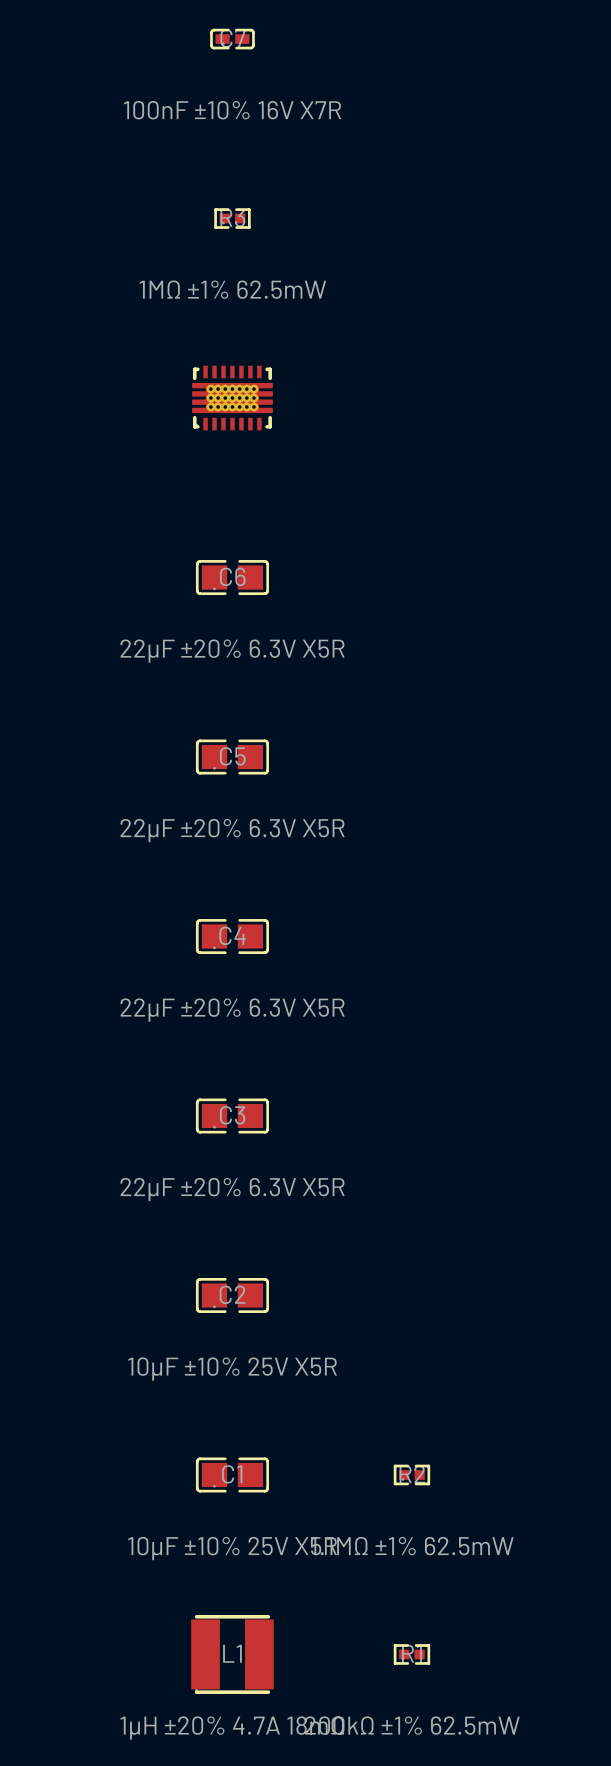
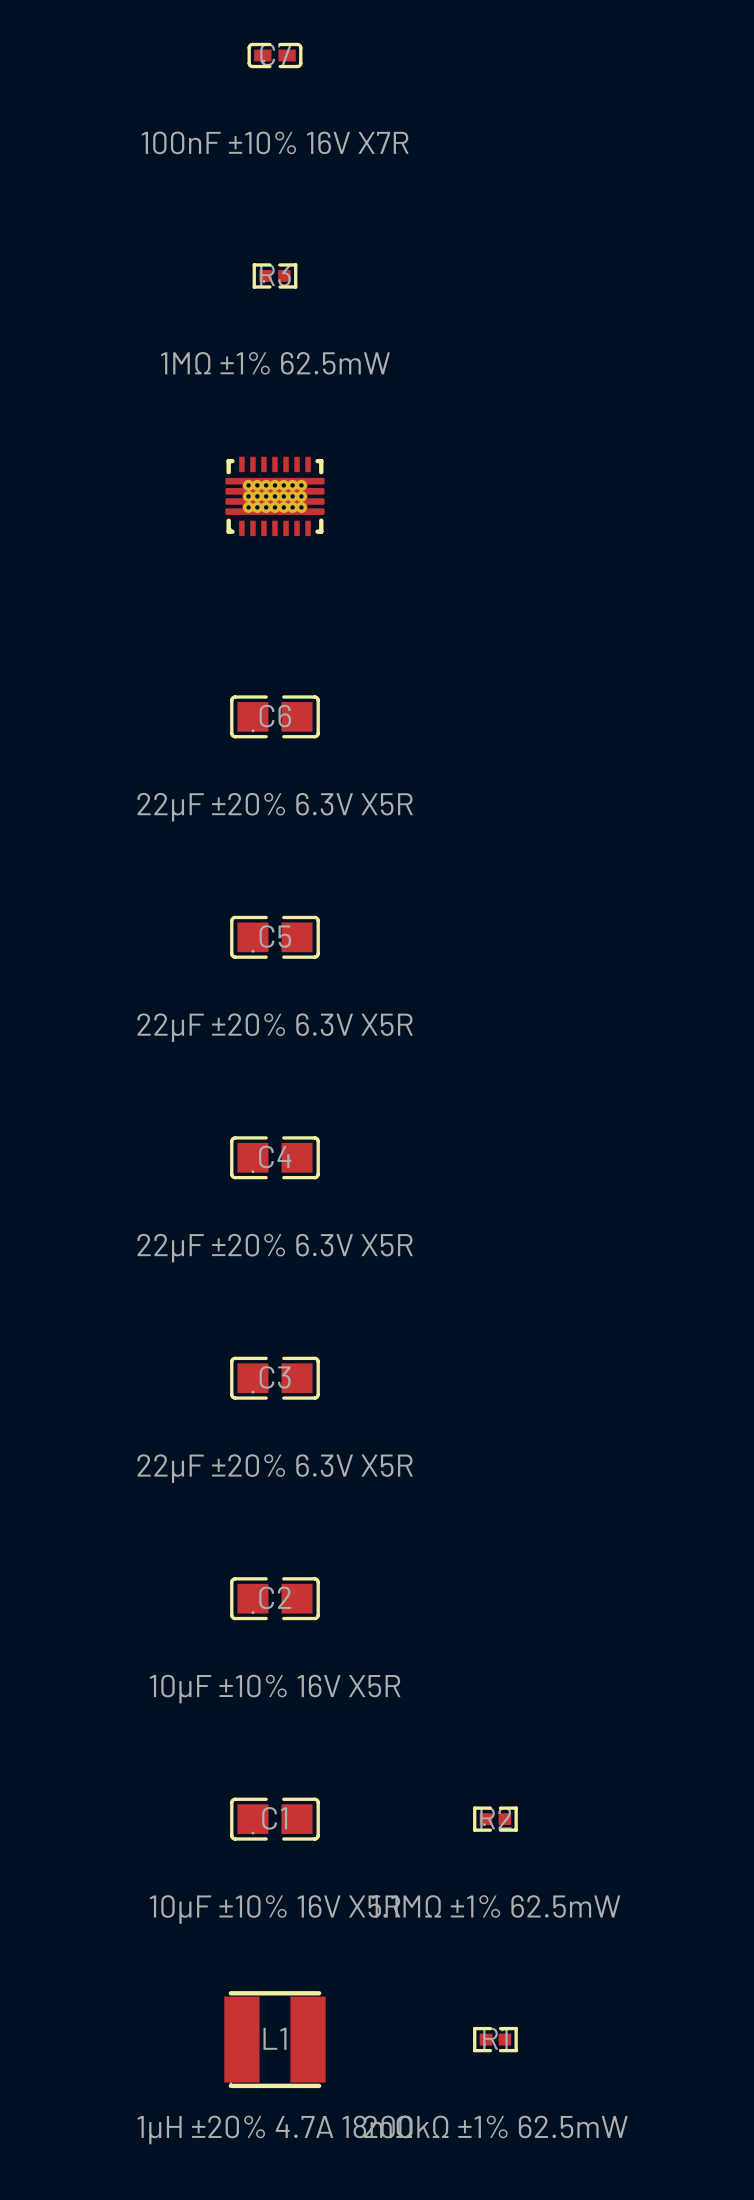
C2 value: 10µF ±10% 25V X5R (232, 1369) -> 10µF ±10% 16V X5R (275, 1689)
C1 value: 10µF ±10% 25V X5R (232, 1548) -> 10µF ±10% 16V X5R (275, 1909)

